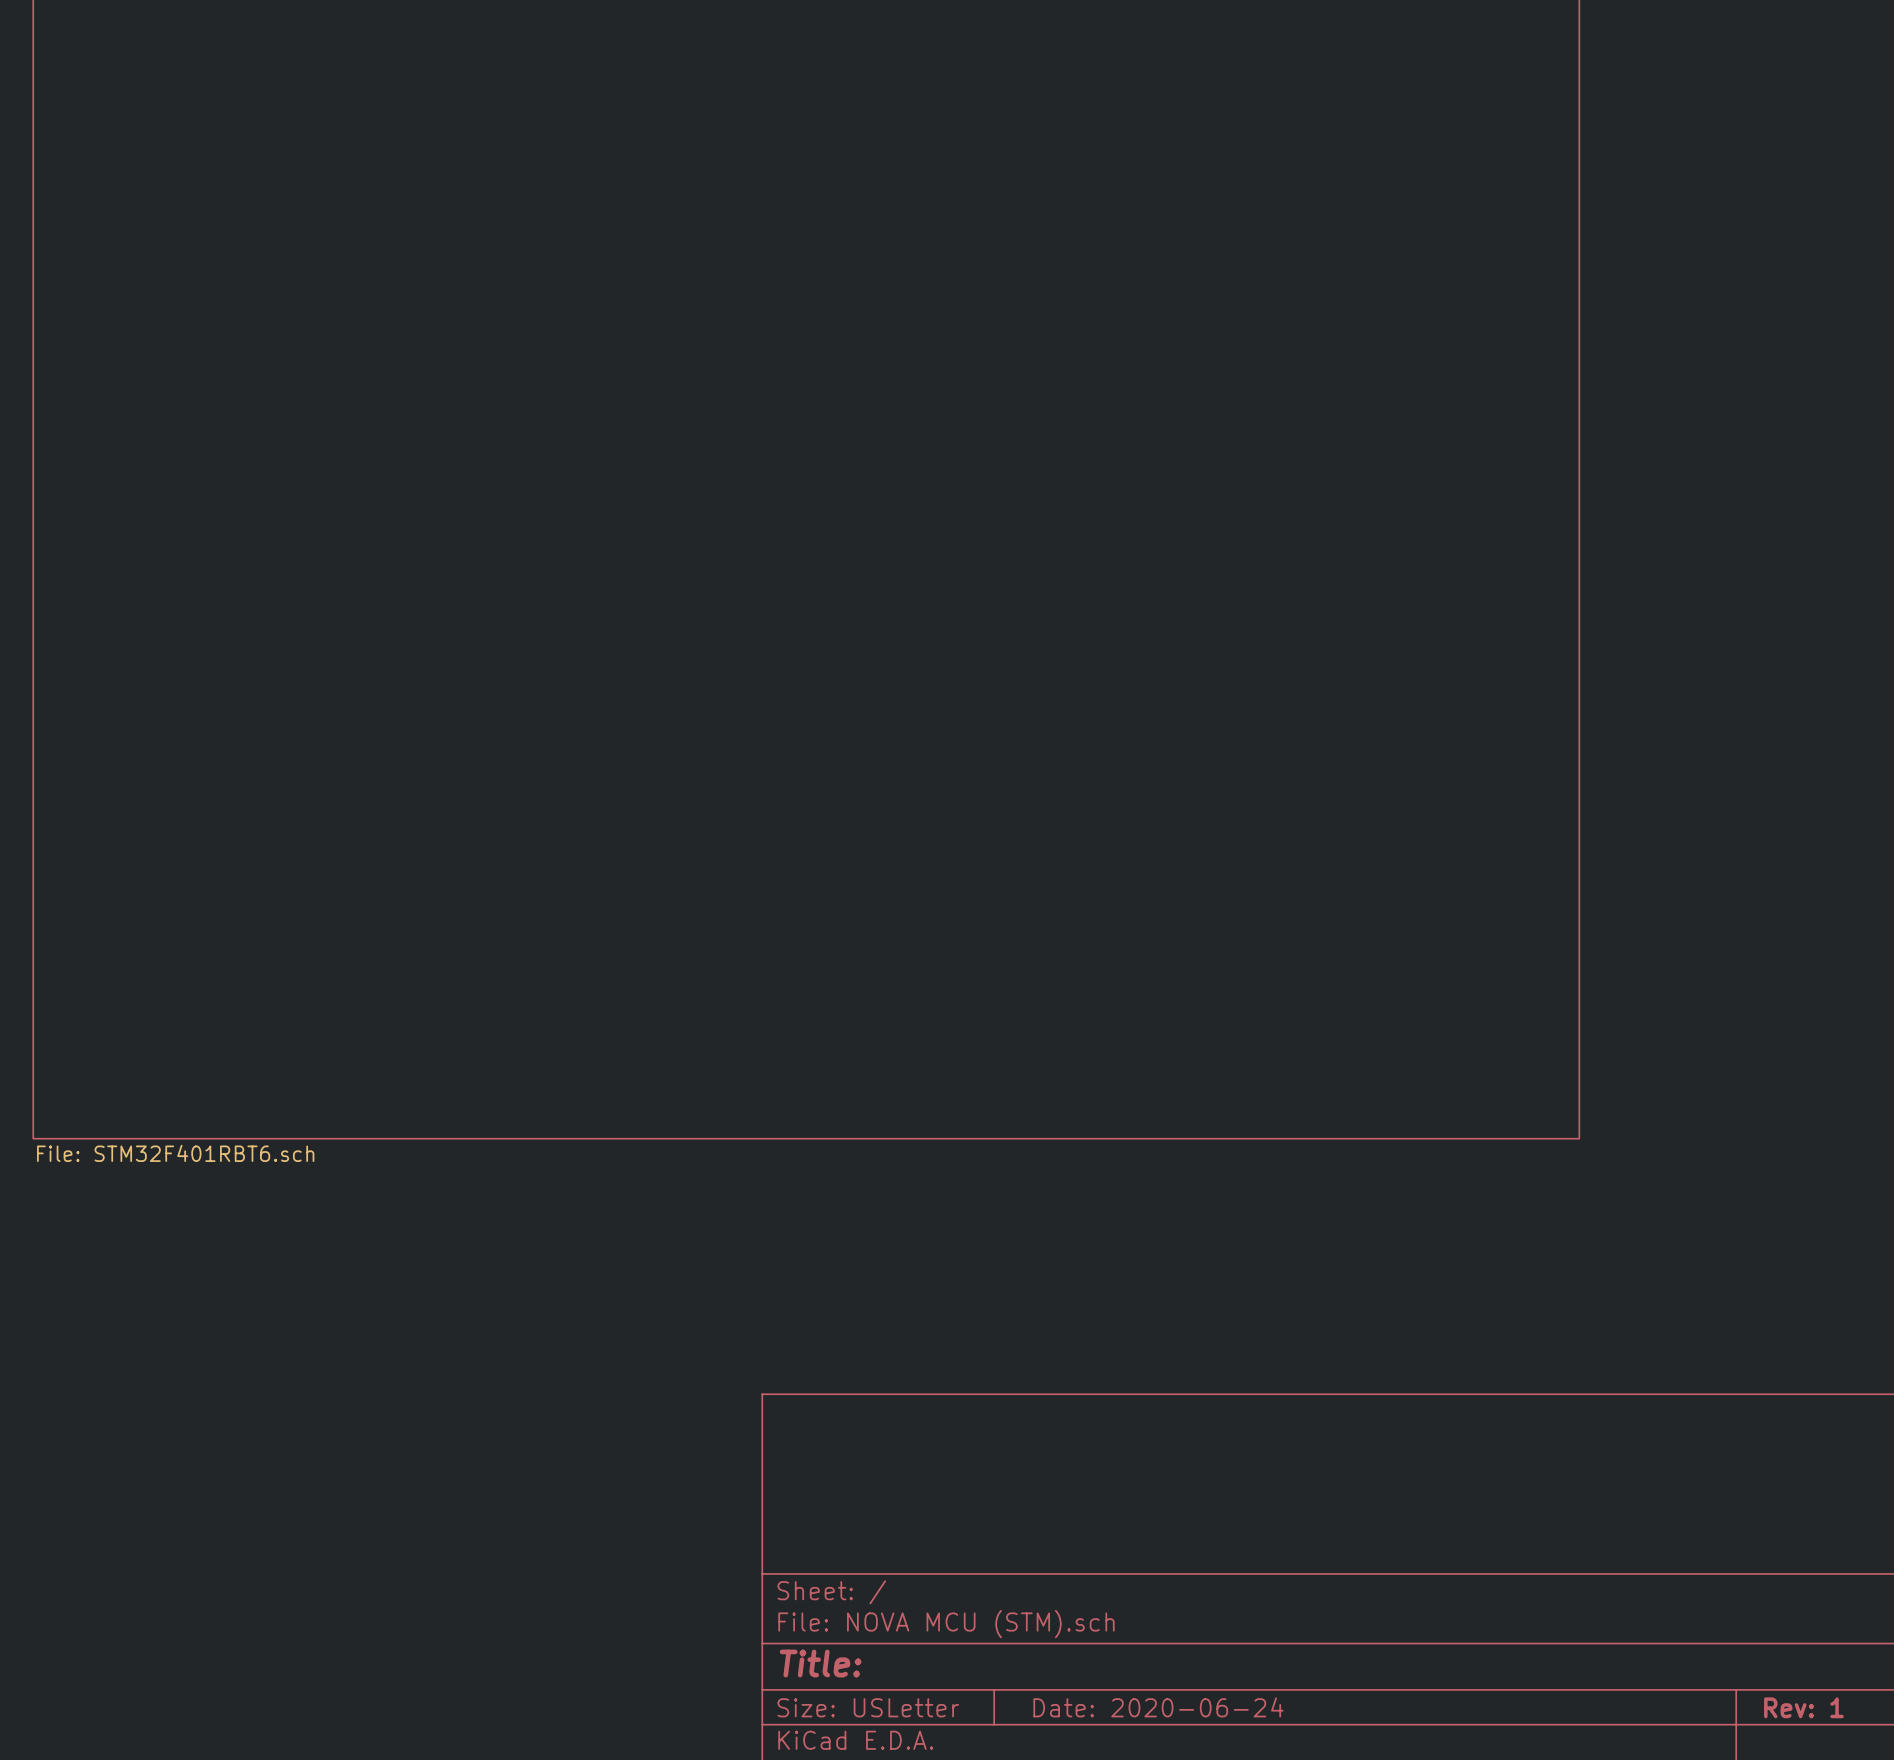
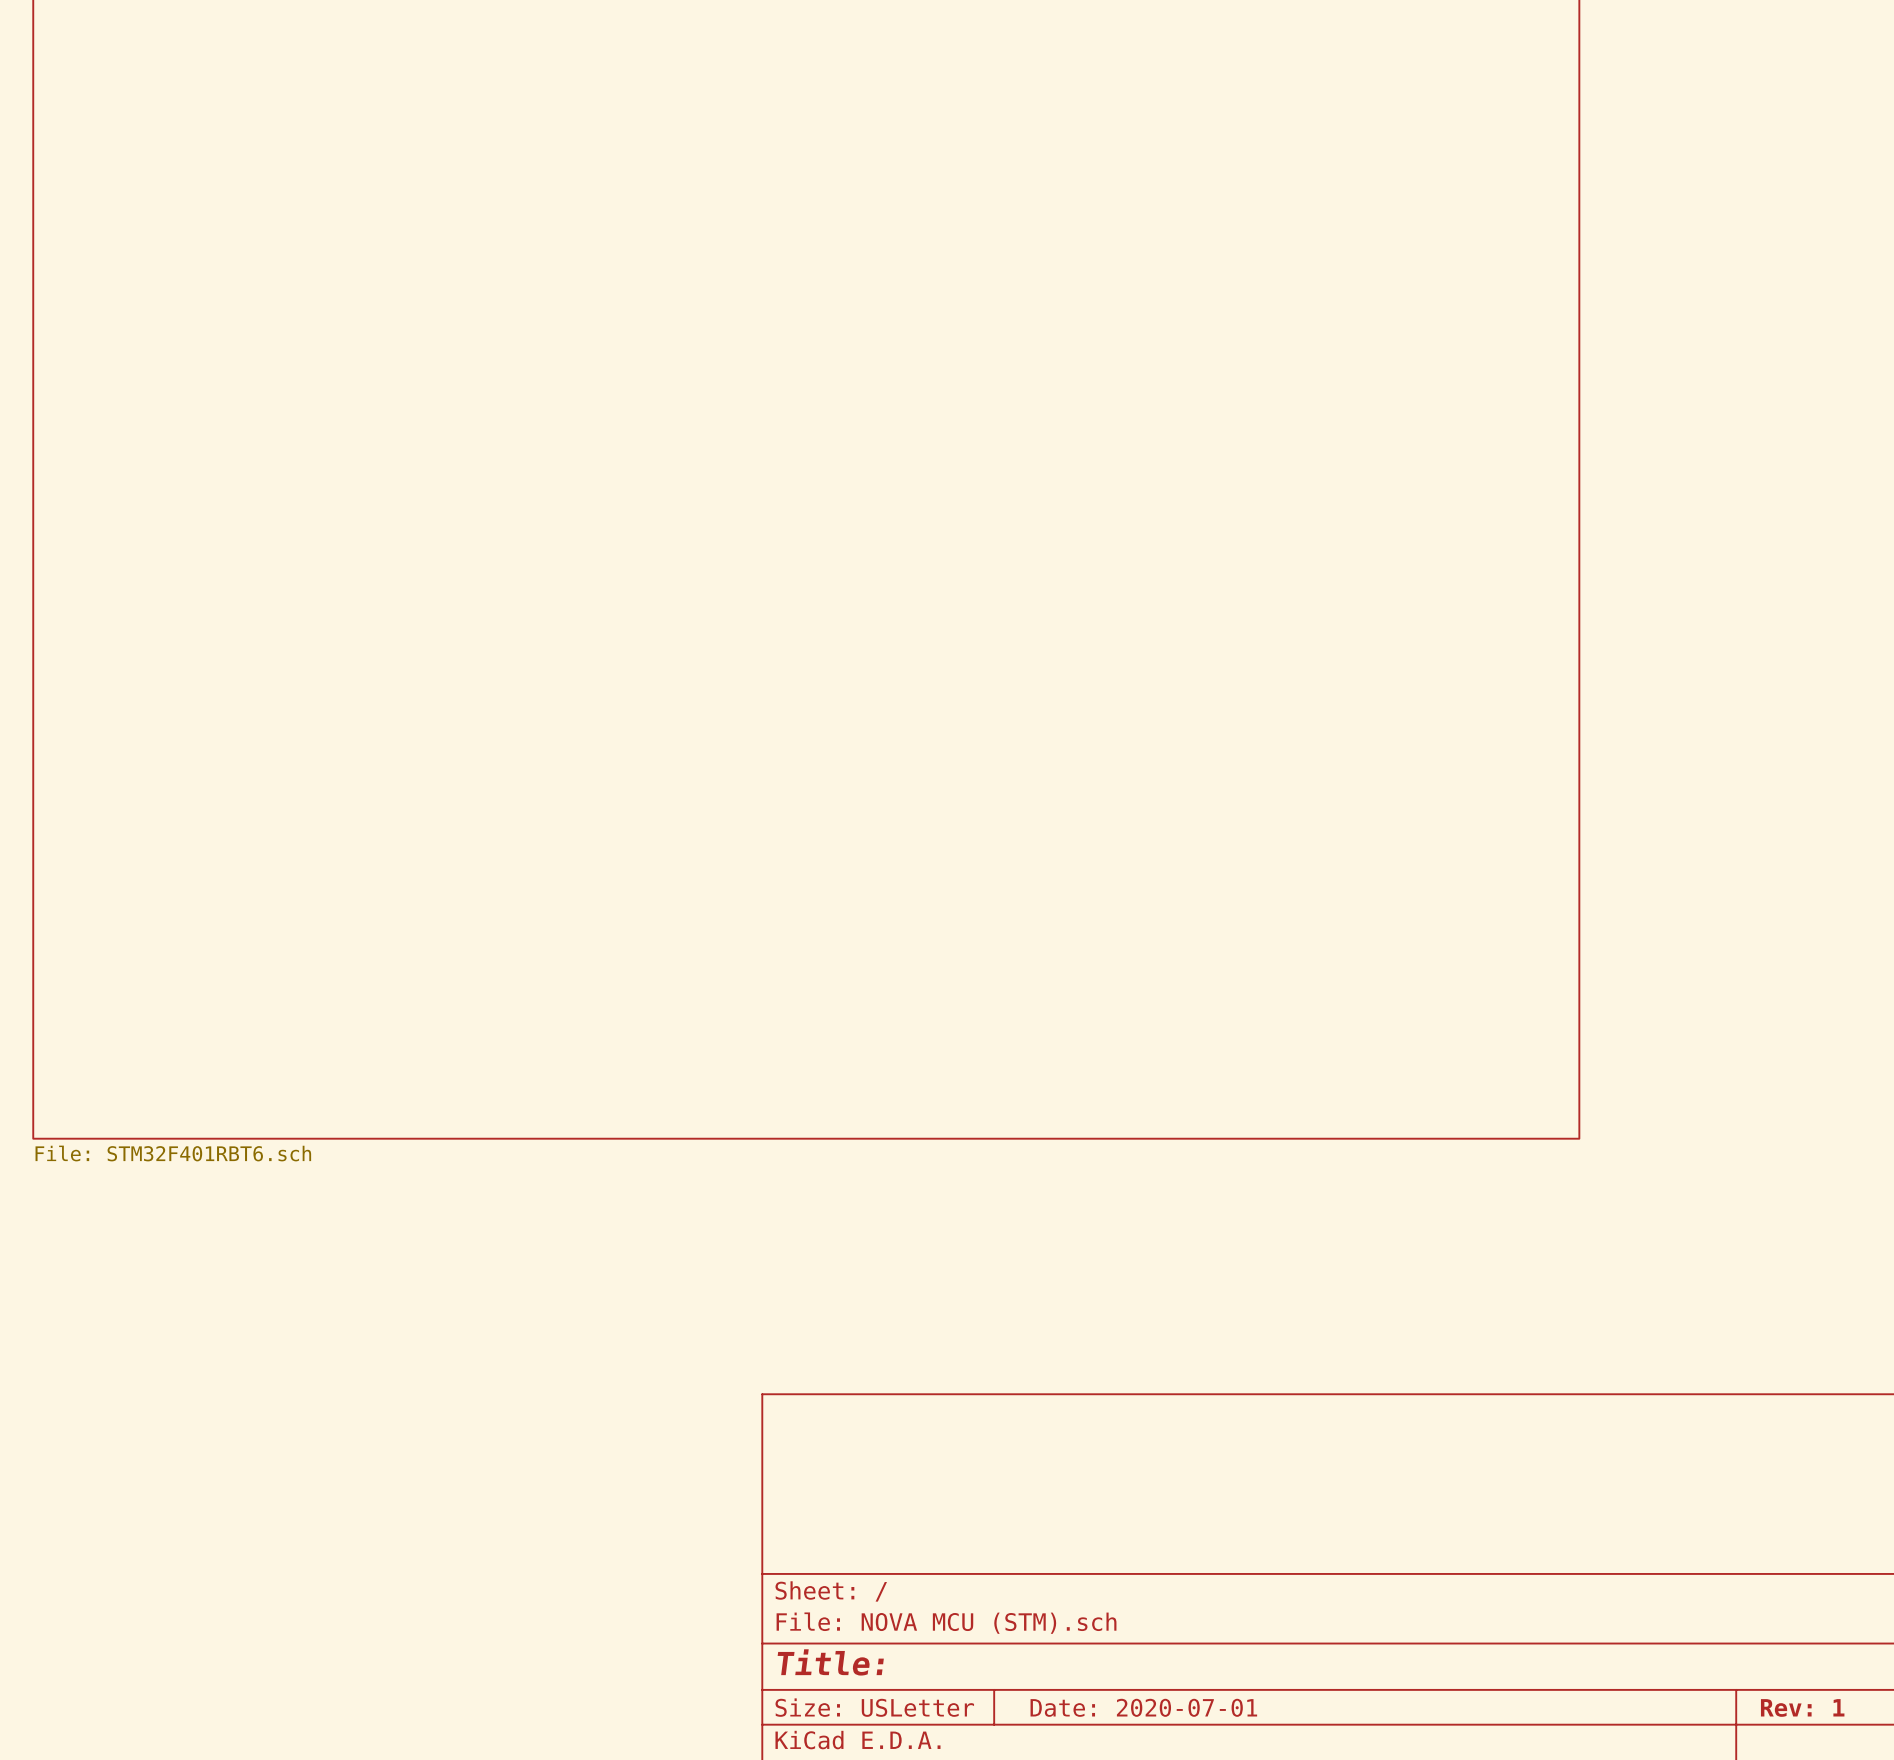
title block: Date: 2020-06-24 (1158, 1707) -> Date: 2020-07-01 (1143, 1707)

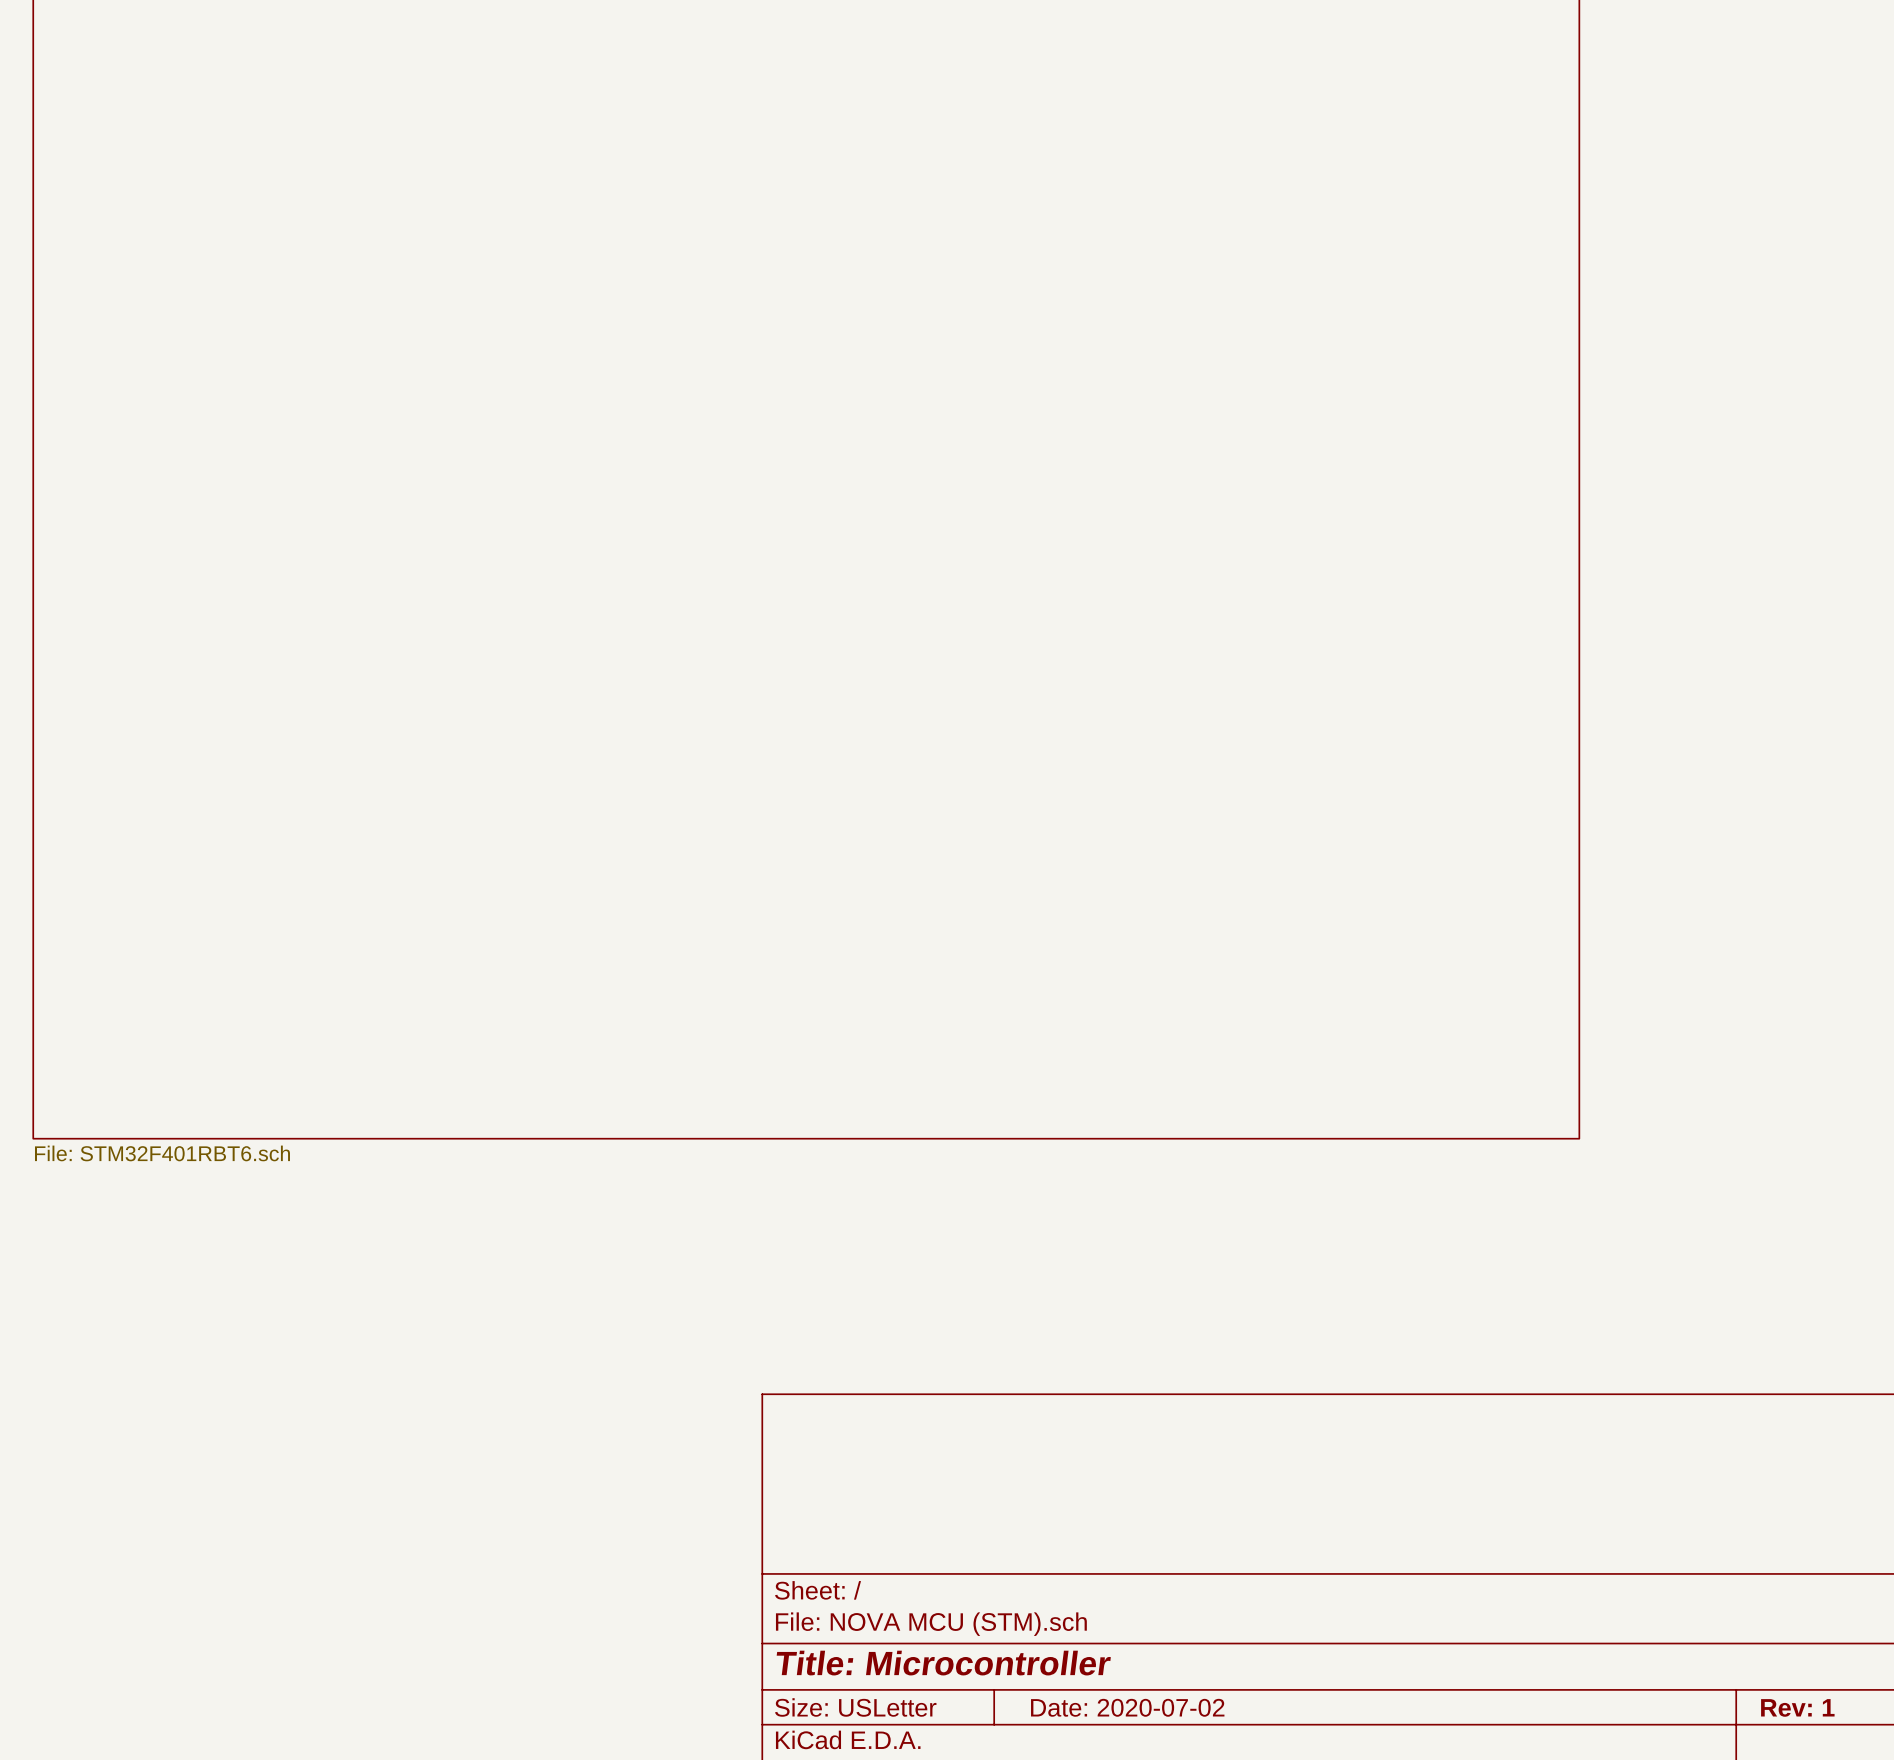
title block: Title: (830, 1662) -> Title: Microcontroller (943, 1663)
title block: Date: 2020-07-01 (1143, 1707) -> Date: 2020-07-02 (1127, 1707)

